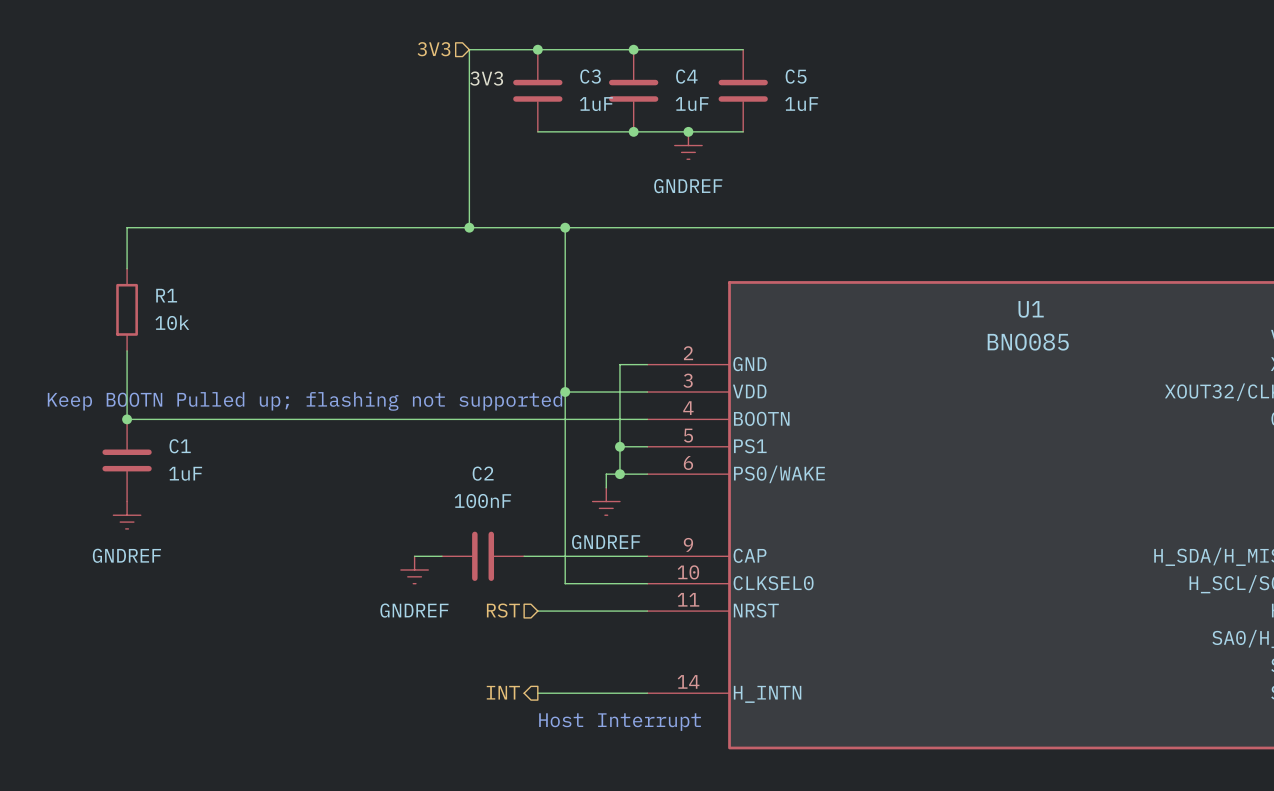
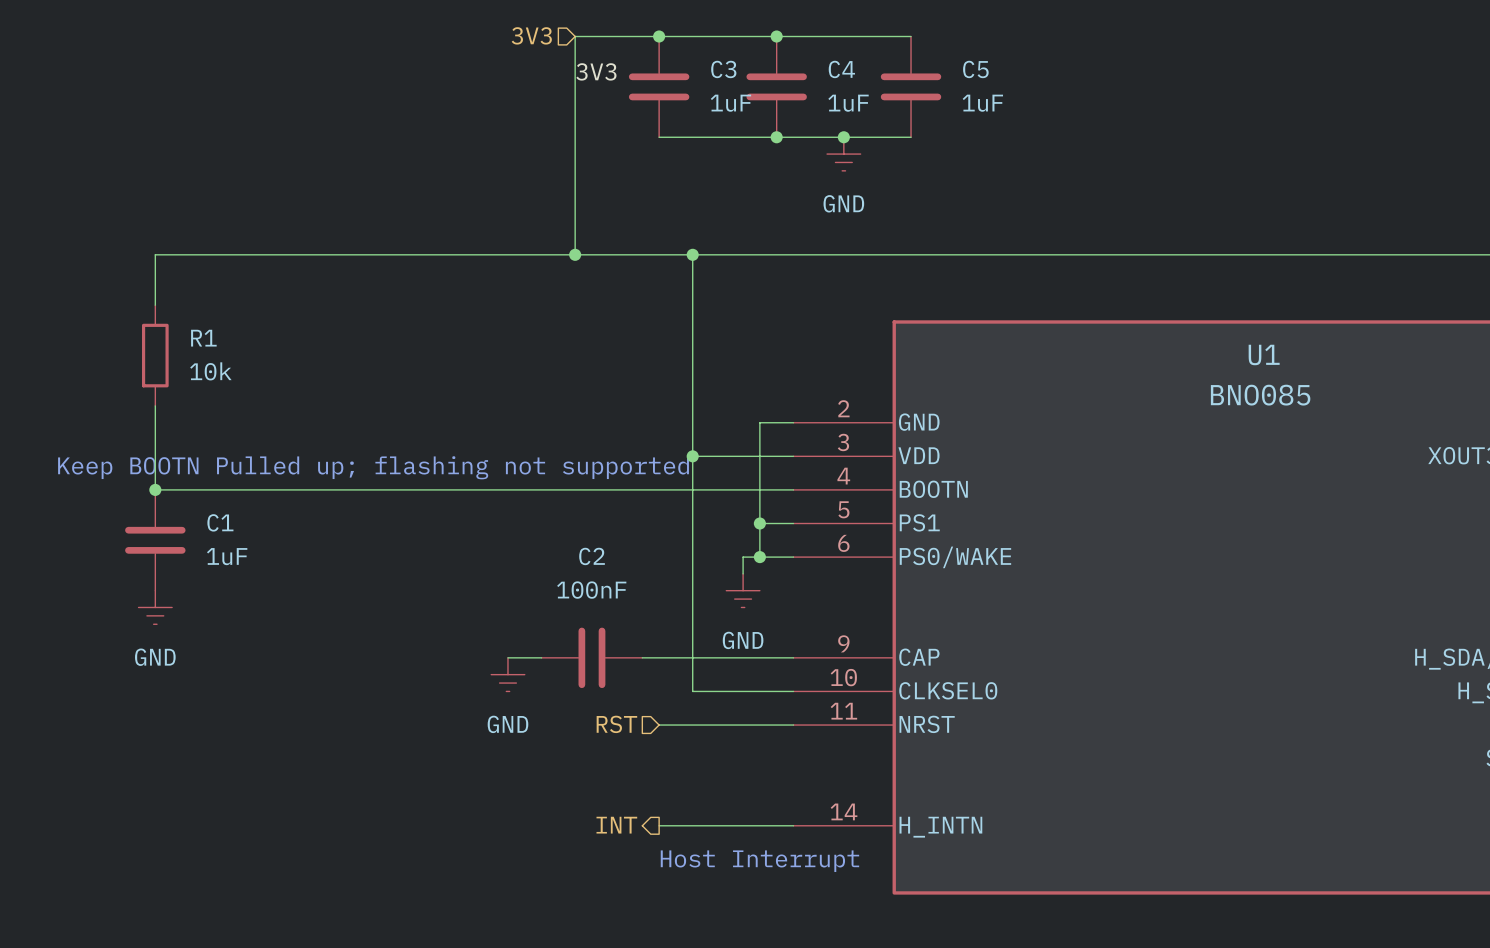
power symbol: GNDREF (688, 145) -> GND (843, 154)
power symbol: GNDREF (606, 501) -> GND (743, 590)
power symbol: GNDREF (127, 515) -> GND (155, 607)
power symbol: GNDREF (414, 569) -> GND (507, 674)

